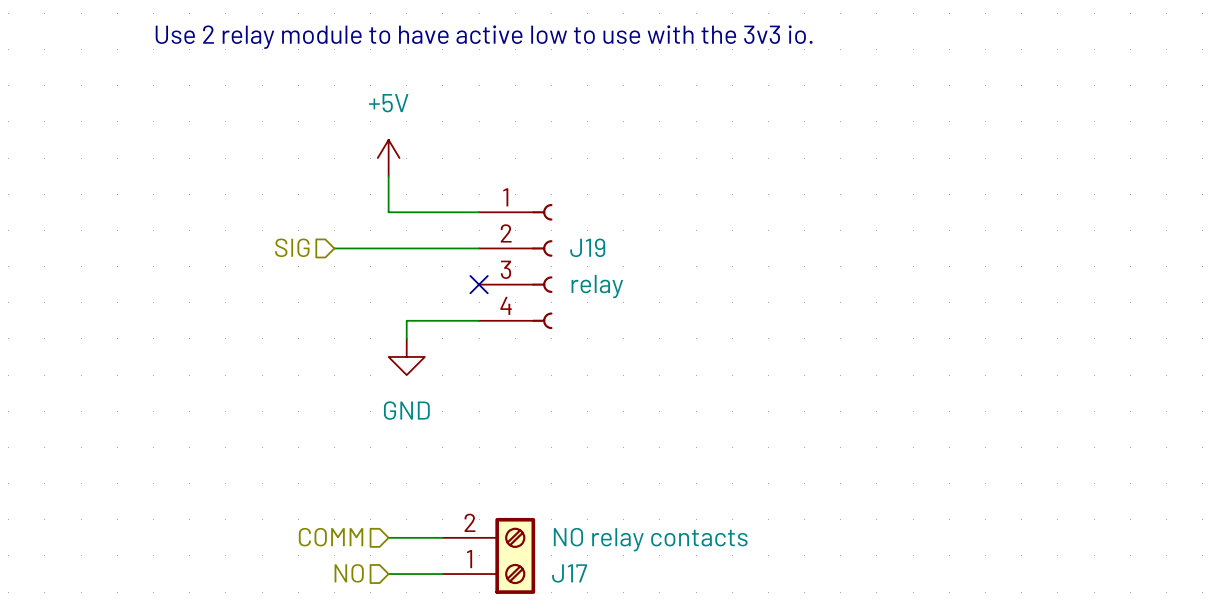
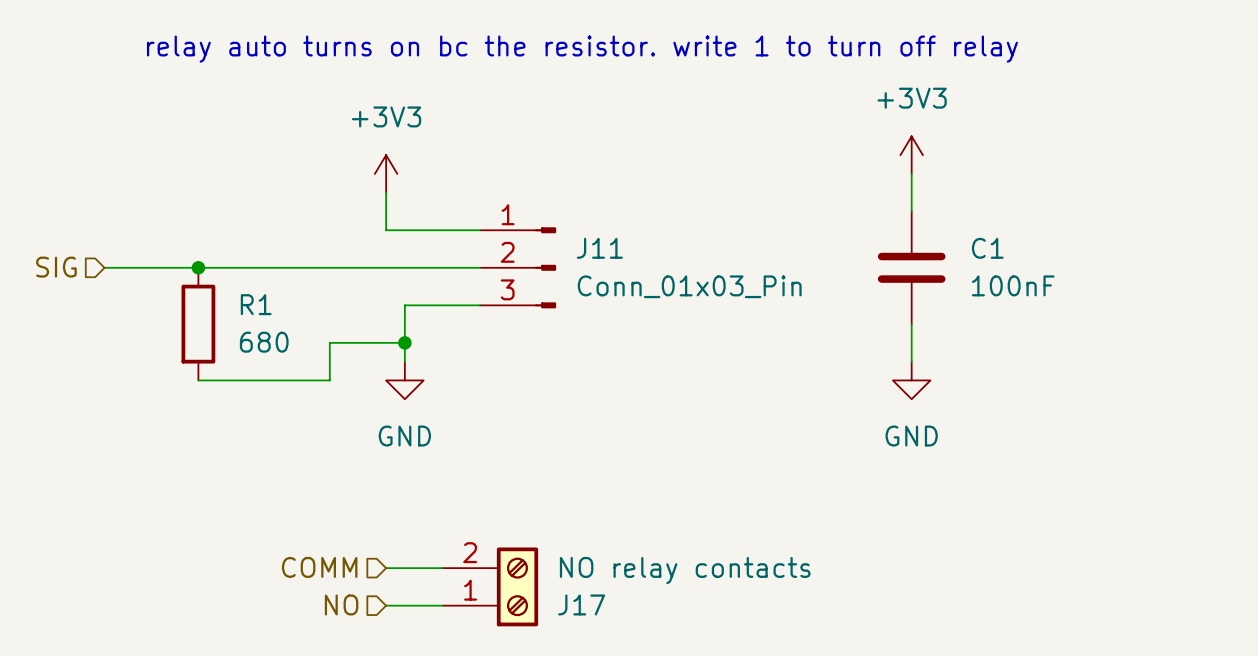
text: Use 2 relay module to have active low to use with the 3v3 io. (484, 37) -> relay auto turns on bc the resistor. write 1 to turn off relay (582, 49)
power symbol: none -> +3V3 (911, 155)
power symbol: +5V (388, 158) -> +3V3 (386, 173)
wire: none -> (911, 173) (911, 211)
hierarchical label position: SIG (292, 247) -> SIG (56, 267)
wire: none -> (104, 267) (329, 267)
junction: none -> (198, 267)
J11: none -> Conn_01x03_Pin (518, 267)
C1: none -> 100nF (911, 267)
J19: relay (515, 266) -> none
wire: none -> (479, 305) (404, 305) (404, 342) (329, 342) (329, 380) (198, 380)
no-connect mark: (479, 284) -> none
R1: none -> 680 (198, 324)
wire: none -> (911, 324) (911, 361)
wire: (406, 320) (479, 320) -> none
junction: none -> (404, 342)
power symbol: none -> GND (911, 380)

